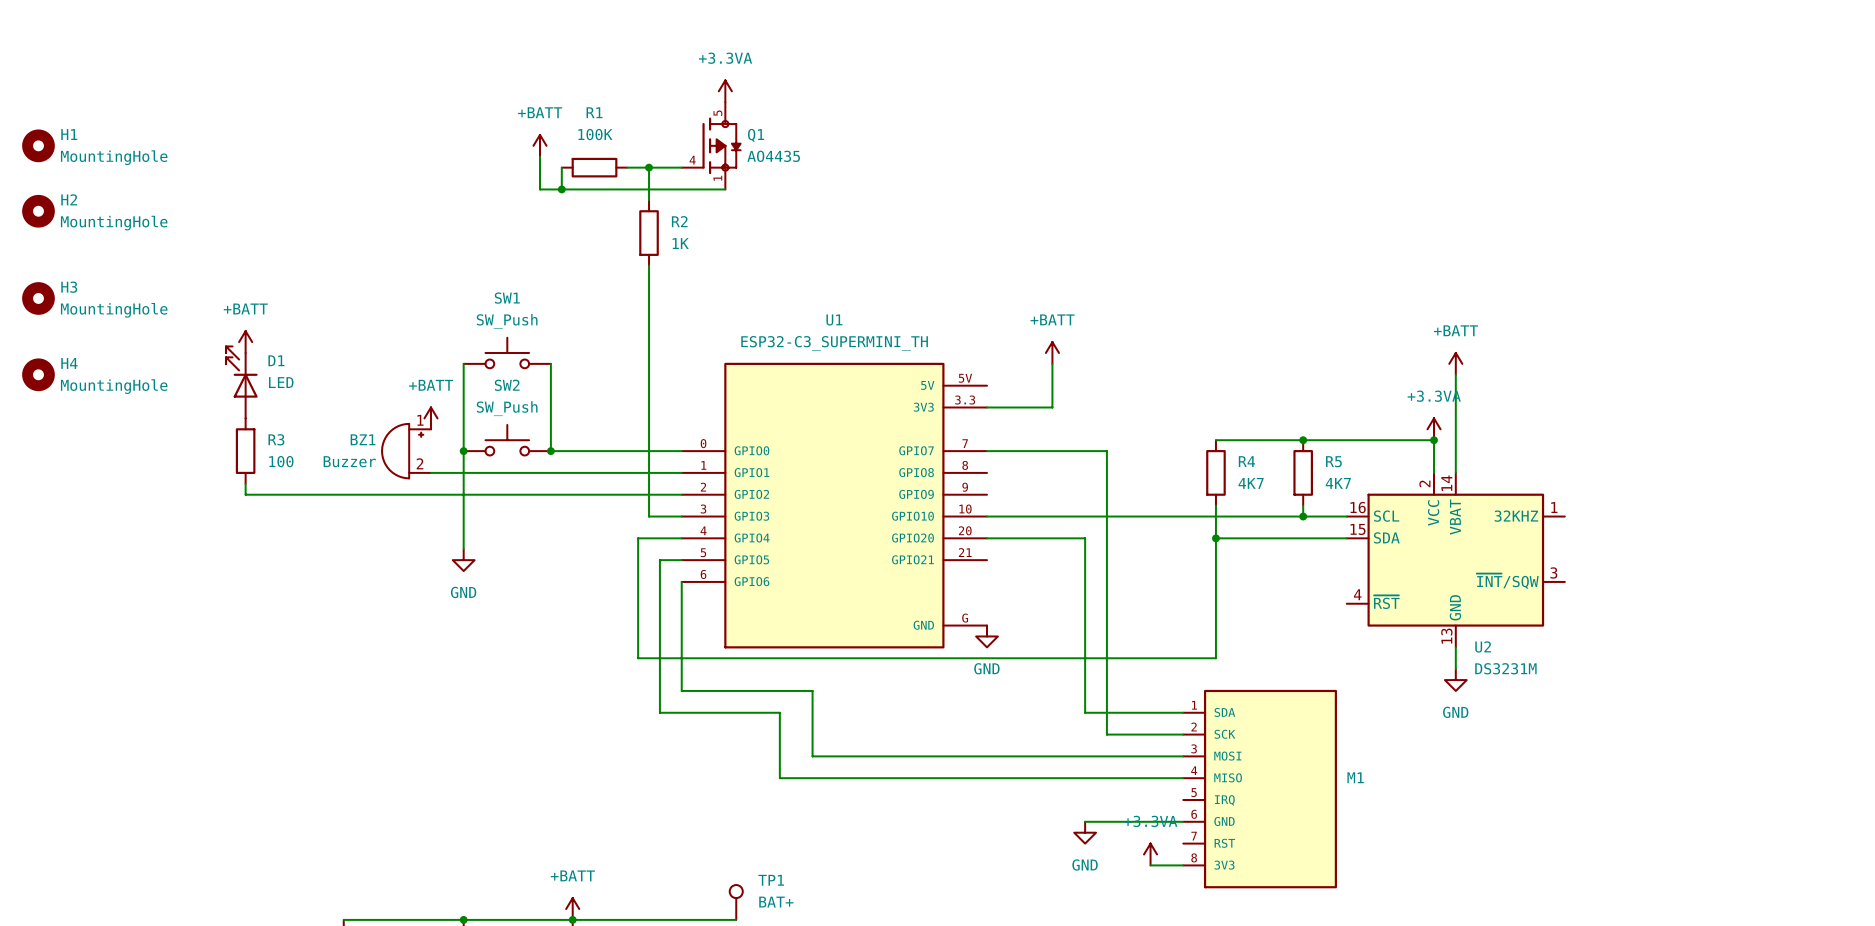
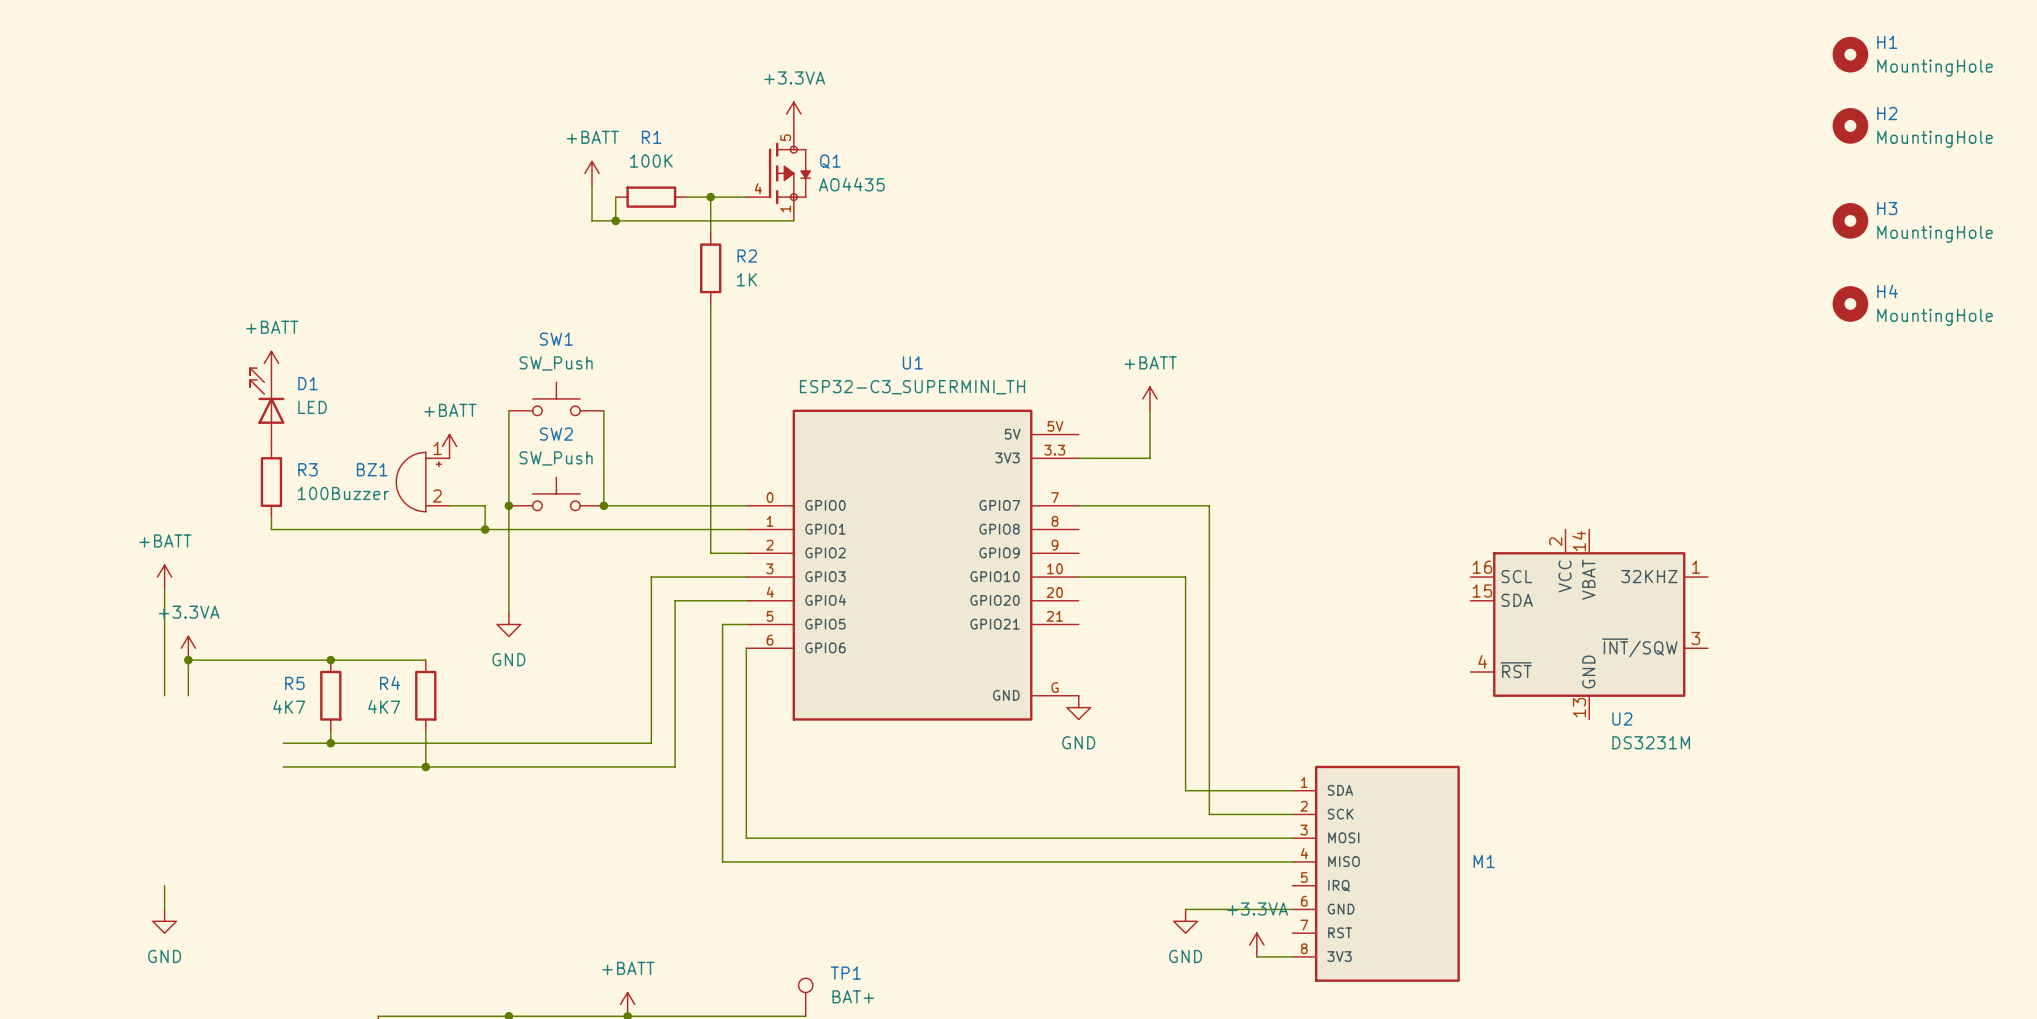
H1 position: (38, 145) -> (1850, 54)
H2 position: (38, 211) -> (1850, 125)
H3 position: (38, 298) -> (1850, 220)
power symbol position: +BATT (245, 342) -> +BATT (271, 363)
power symbol: +BATT (1455, 363) -> none
H4 position: (38, 374) -> (1850, 303)
wire: (1455, 374) (1455, 472) -> none
D1 position: (241, 382) -> (267, 407)
power symbol position: +BATT (430, 418) -> +BATT (449, 446)
power symbol: +3.3VA (1434, 429) -> none
wire: (1215, 440) (1434, 440) (1434, 472) -> none
junction: (1303, 440) -> none
junction: (1434, 440) -> none
R3 position: (245, 451) -> (271, 482)
BZ1 position: (406, 451) -> (422, 482)
wire: none -> (449, 505) (485, 505) (485, 529)
R4 name position: R4 (1246, 461) -> R4 (390, 683)
R5 name position: R5 (1333, 461) -> R5 (294, 683)
wire: none -> (271, 517) (271, 529) (473, 529)
junction: none -> (485, 529)
R4 position: (1215, 472) -> (425, 695)
R5 position: (1303, 472) -> (330, 695)
wire: (245, 483) (245, 494) (649, 494) (649, 516) -> (283, 743) (651, 743) (651, 577) (710, 577)
R4 value position: 4K7 (1251, 483) -> 4K7 (384, 706)
R5 value position: 4K7 (1338, 483) -> 4K7 (289, 706)
wire: (1215, 505) (1215, 658) (638, 658) (638, 538) -> (283, 766) (675, 766) (675, 600) (698, 600)
wire: (1303, 505) (1303, 516) -> none
power symbol: none -> +BATT (164, 577)
wire: (1085, 516) (1346, 516) -> none
junction: (1303, 516) -> none
wire: none -> (164, 588) (164, 695)
wire: (987, 538) (1085, 538) -> (1185, 577) (1185, 600)
wire: (1215, 538) (1346, 538) -> none
junction: (1215, 538) -> none
power symbol: none -> +3.3VA (188, 648)
junction: none -> (188, 660)
junction: none -> (330, 660)
wire: none -> (425, 660) (188, 660) (188, 695)
wire: (1455, 647) (1455, 669) -> none
wire: none -> (330, 731) (330, 743)
wire: none -> (425, 731) (425, 766)
junction: none -> (330, 743)
power symbol: GND (1455, 680) -> none
junction: none -> (425, 766)
wire: (681, 690) (812, 690) (812, 756) -> (746, 766) (746, 838) (888, 838)
wire: (659, 712) (779, 712) (779, 778) -> (722, 790) (722, 861) (853, 861)
wire: none -> (164, 885) (164, 909)
power symbol: none -> GND (164, 921)

